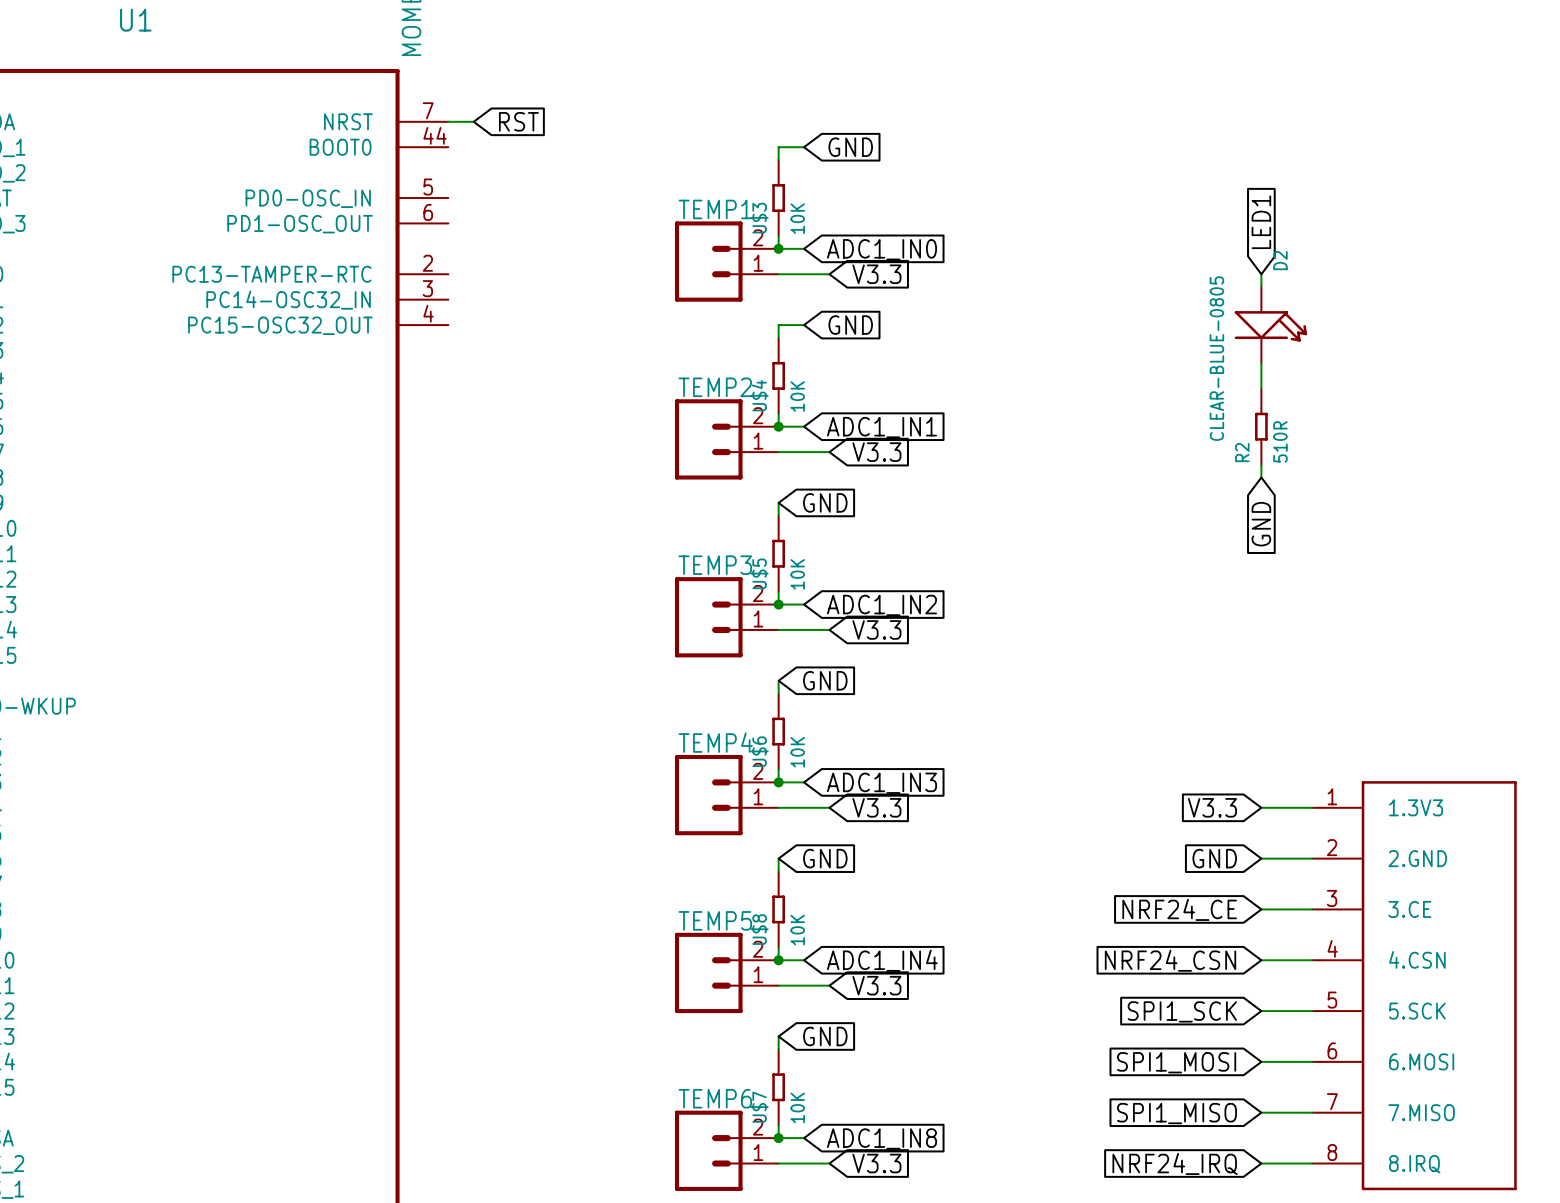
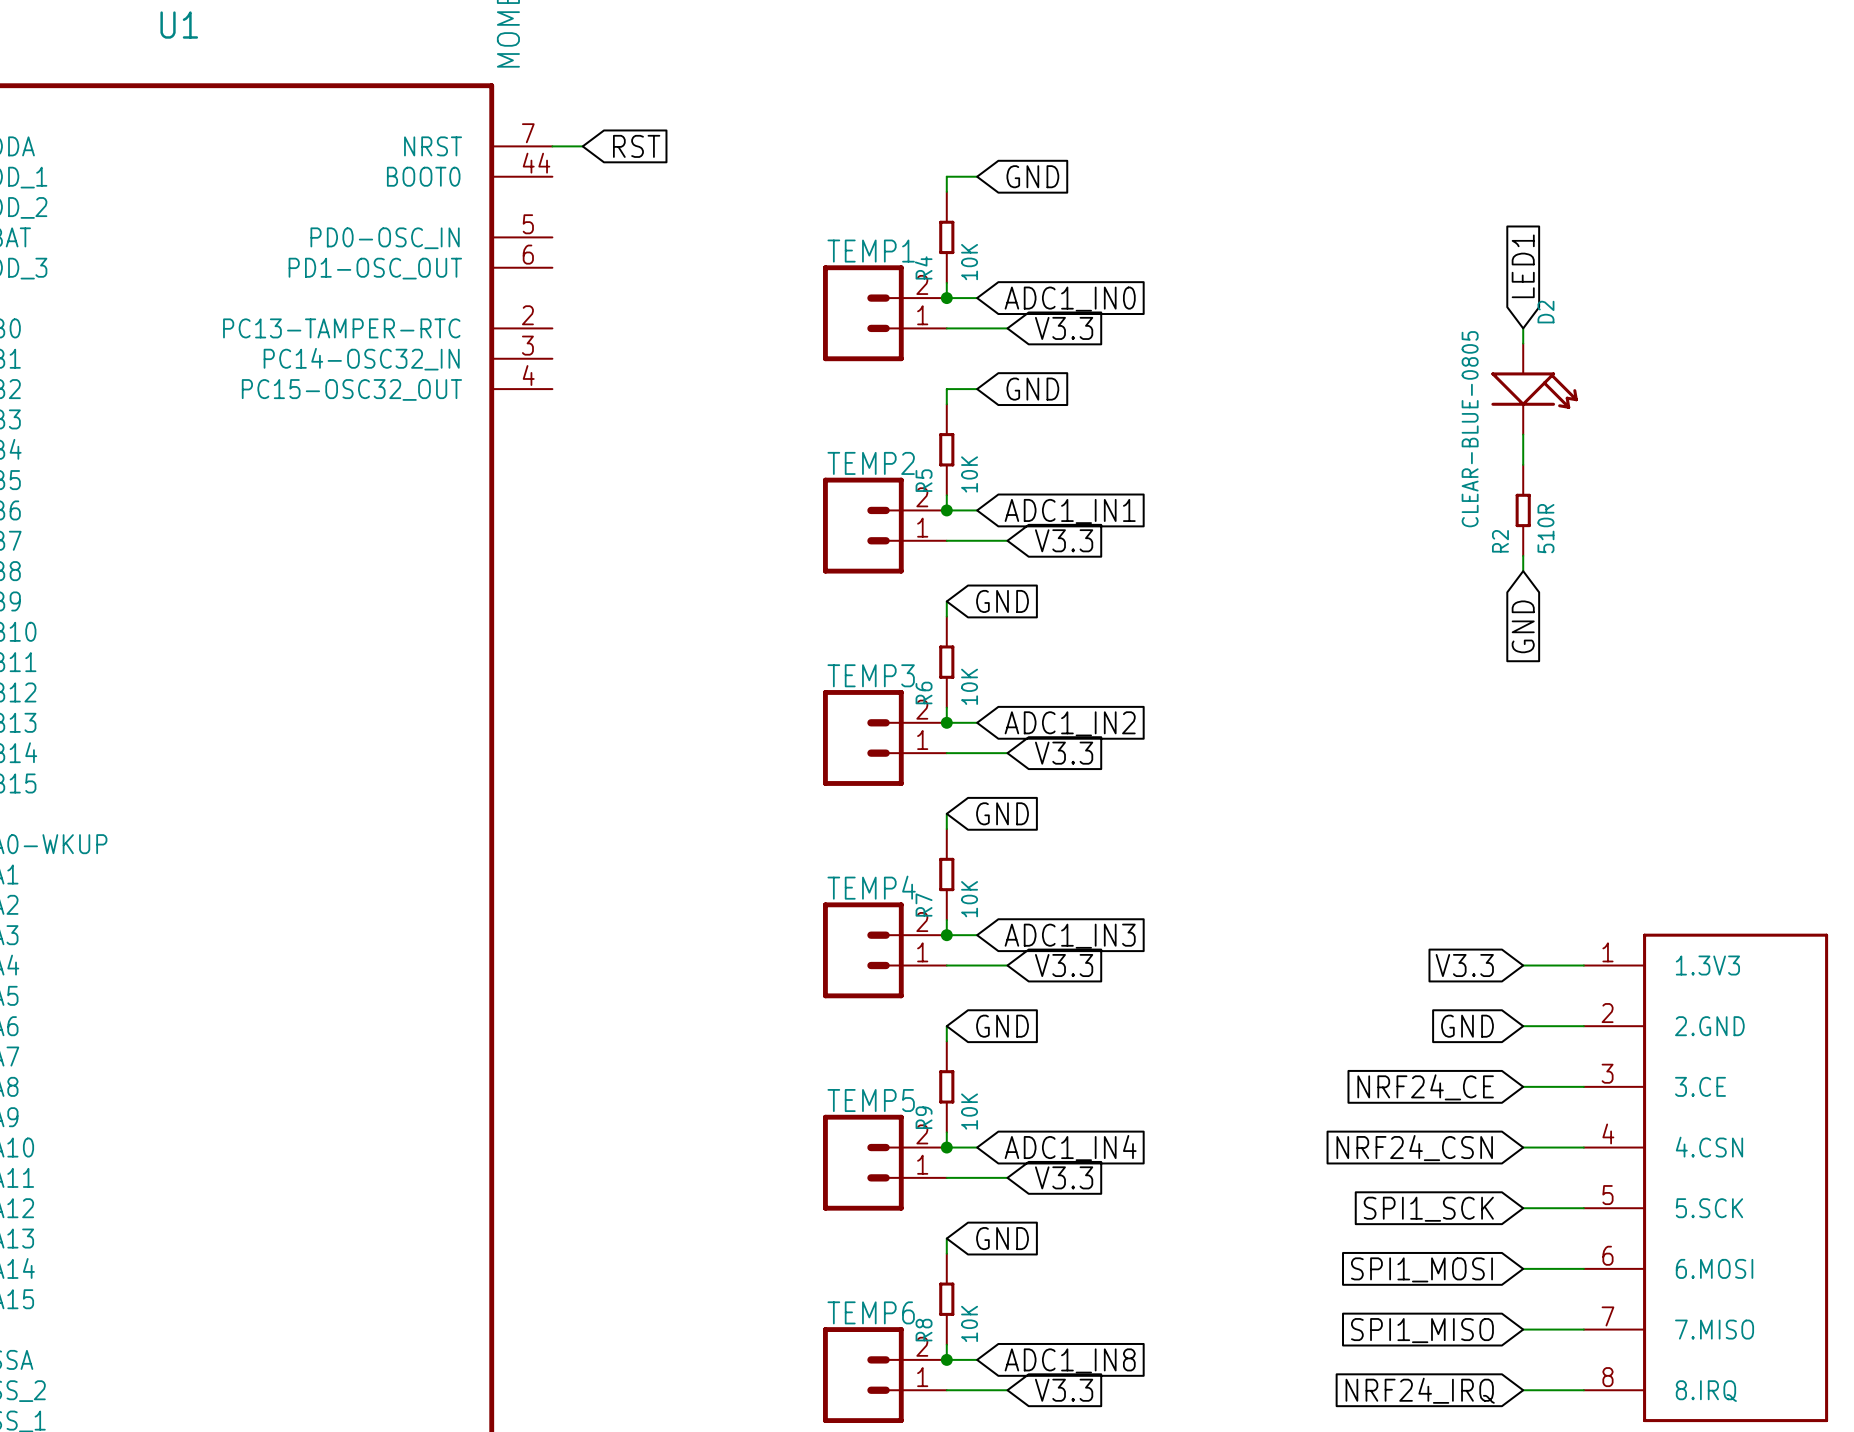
U$3 name: U$3 (759, 218) -> R4 (923, 267)
U$4 name: U$4 (759, 395) -> R5 (924, 480)
U$5 name: U$5 (759, 573) -> R6 (924, 692)
U$6 name: U$6 (759, 751) -> R7 (924, 905)
U$8 name: U$8 (759, 929) -> R9 (924, 1117)
U$7 name: U$7 (759, 1107) -> R8 (924, 1330)

